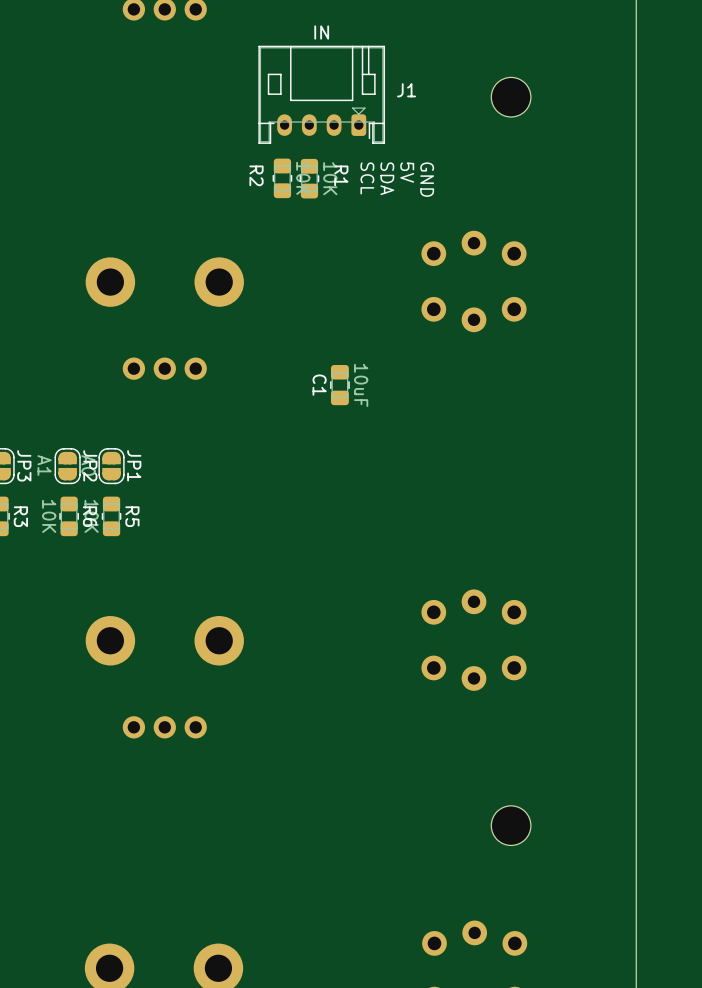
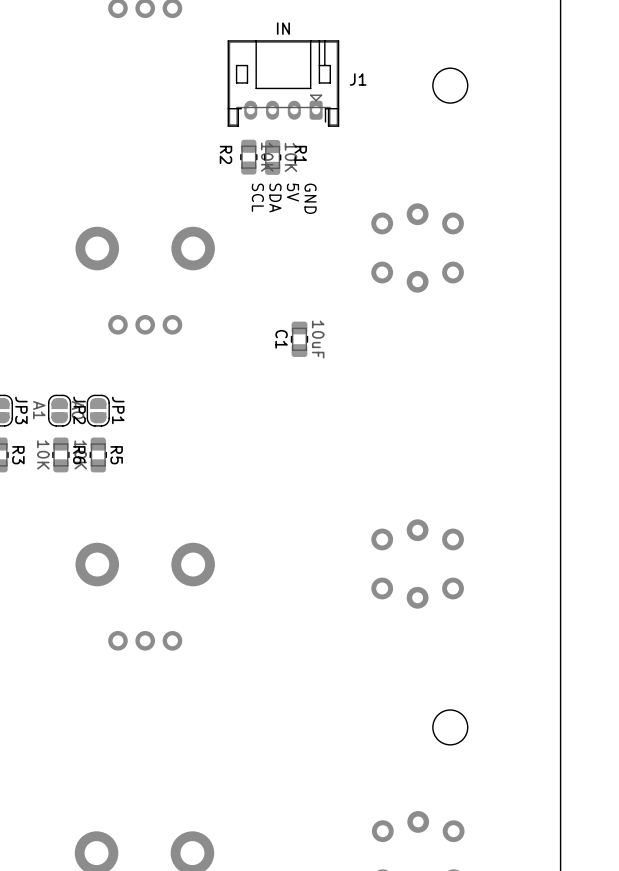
text position: 5V (407, 172) -> 5V (292, 192)
text position: SCL (367, 178) -> SCL (257, 197)
text position: SDA (387, 178) -> SDA (275, 198)
text position: GND (427, 179) -> GND (310, 198)

